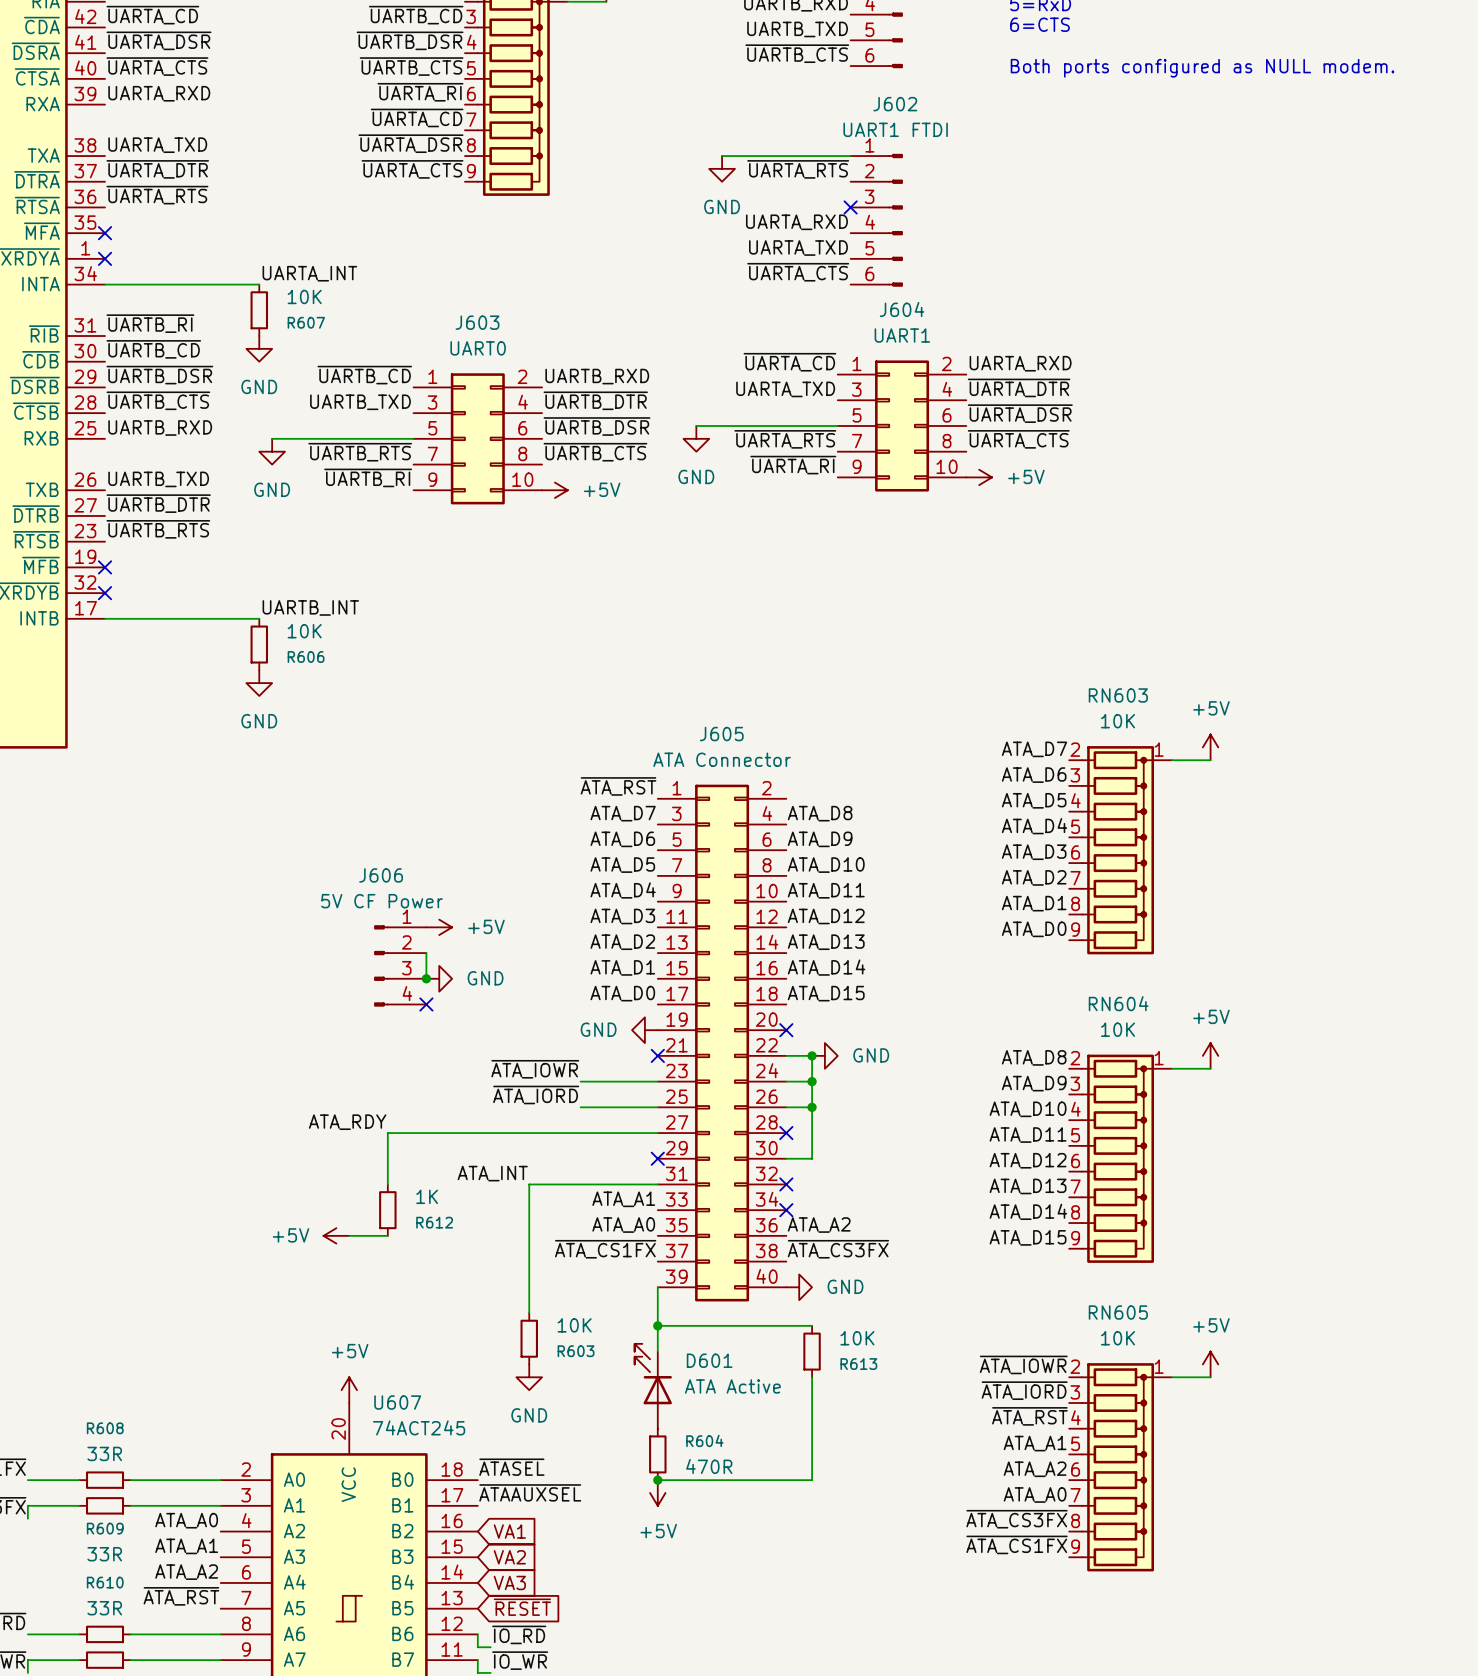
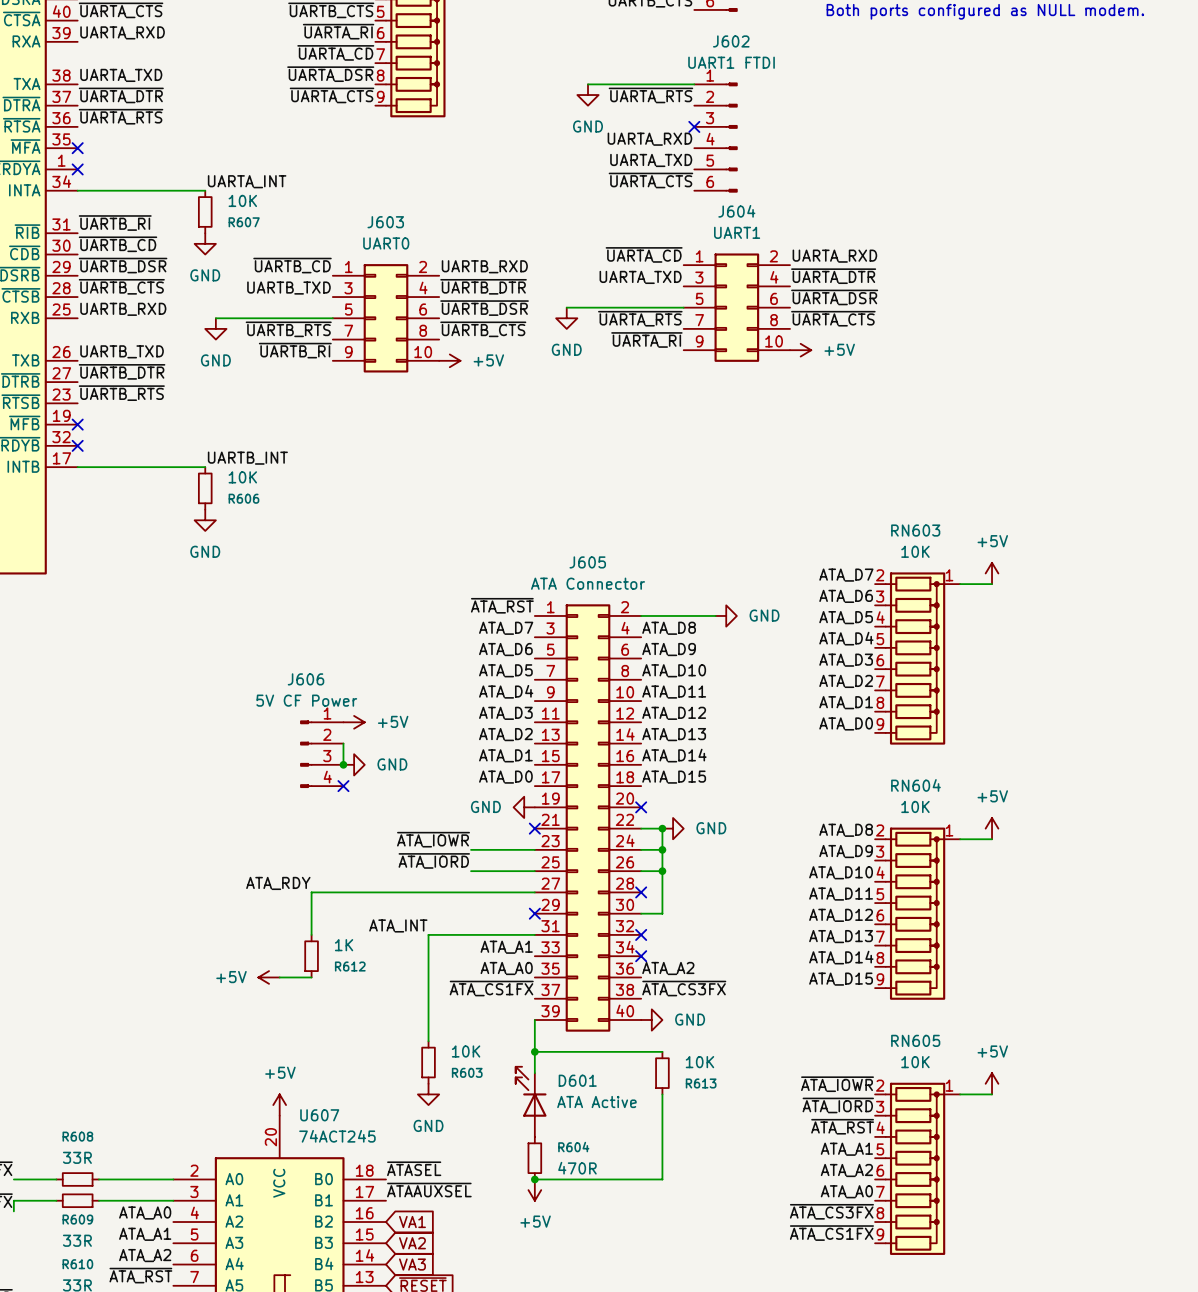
wire: none -> (641, 615) (715, 615)
power symbol: none -> GND (726, 615)

